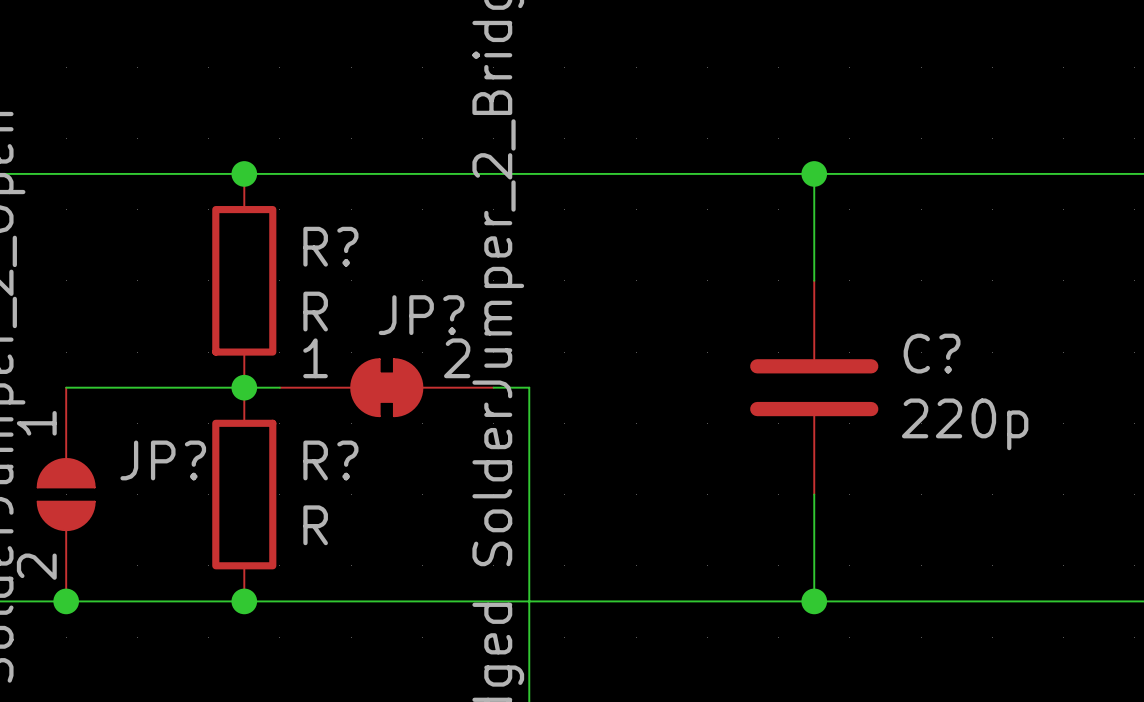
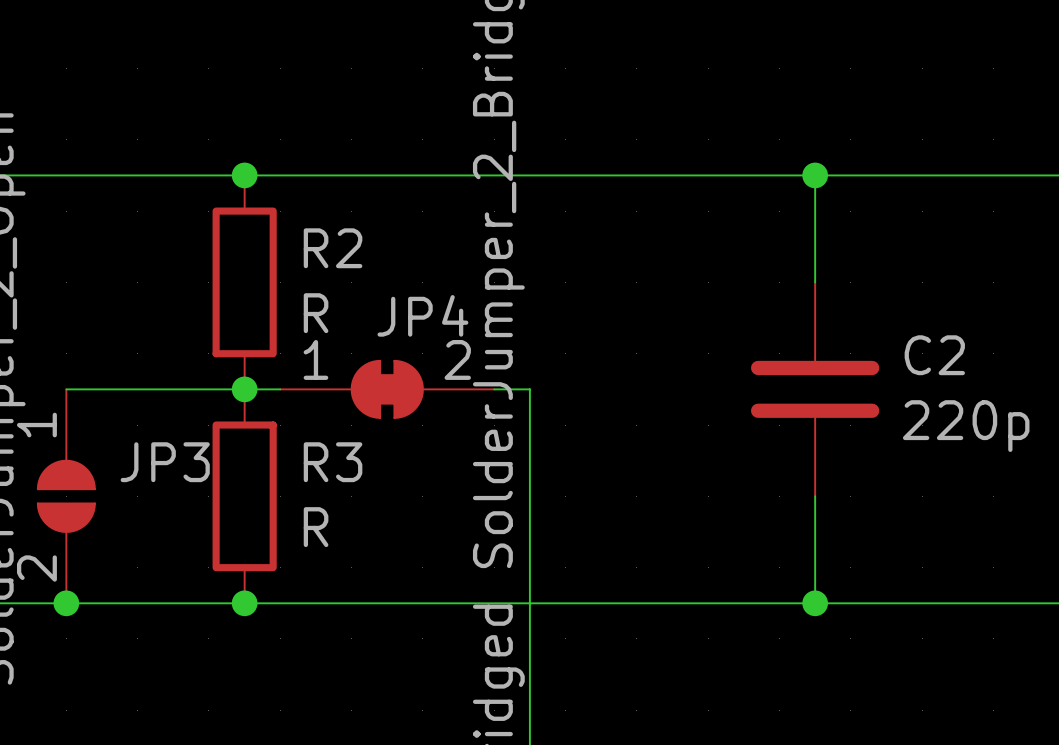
R? name: R? (330, 246) -> R2 (333, 248)
JP? name: JP? (421, 315) -> JP4 (422, 315)
C? name: C? (932, 353) -> C2 (934, 355)
JP? name: JP? (163, 460) -> JP3 (165, 462)
R? name: R? (330, 460) -> R3 (333, 462)

